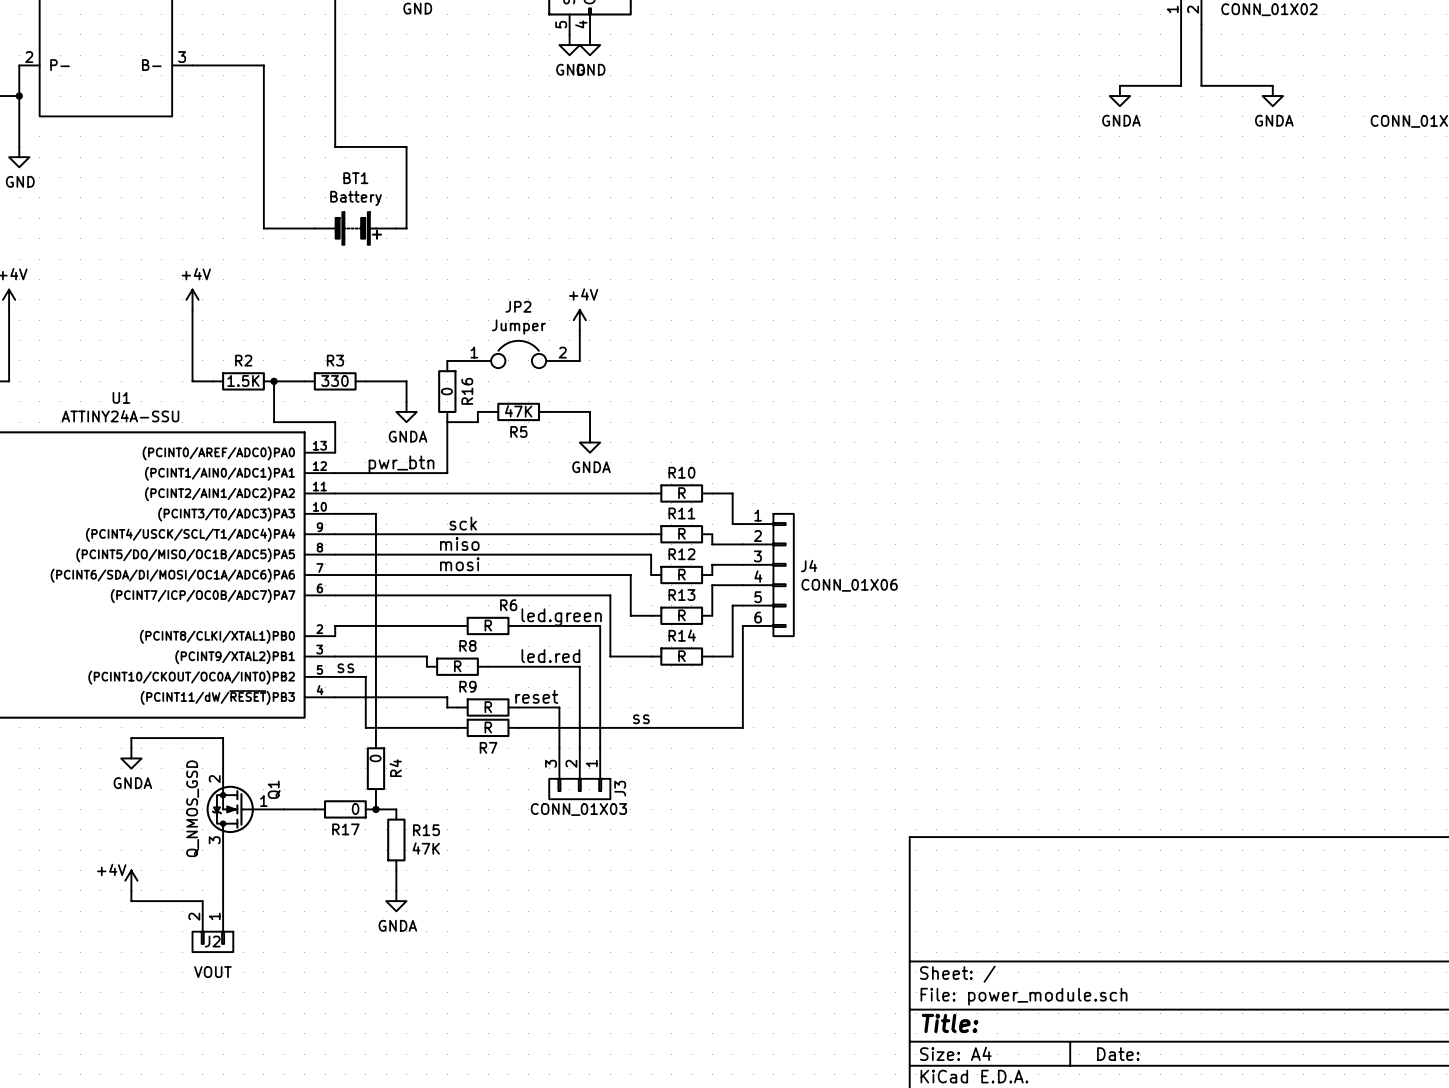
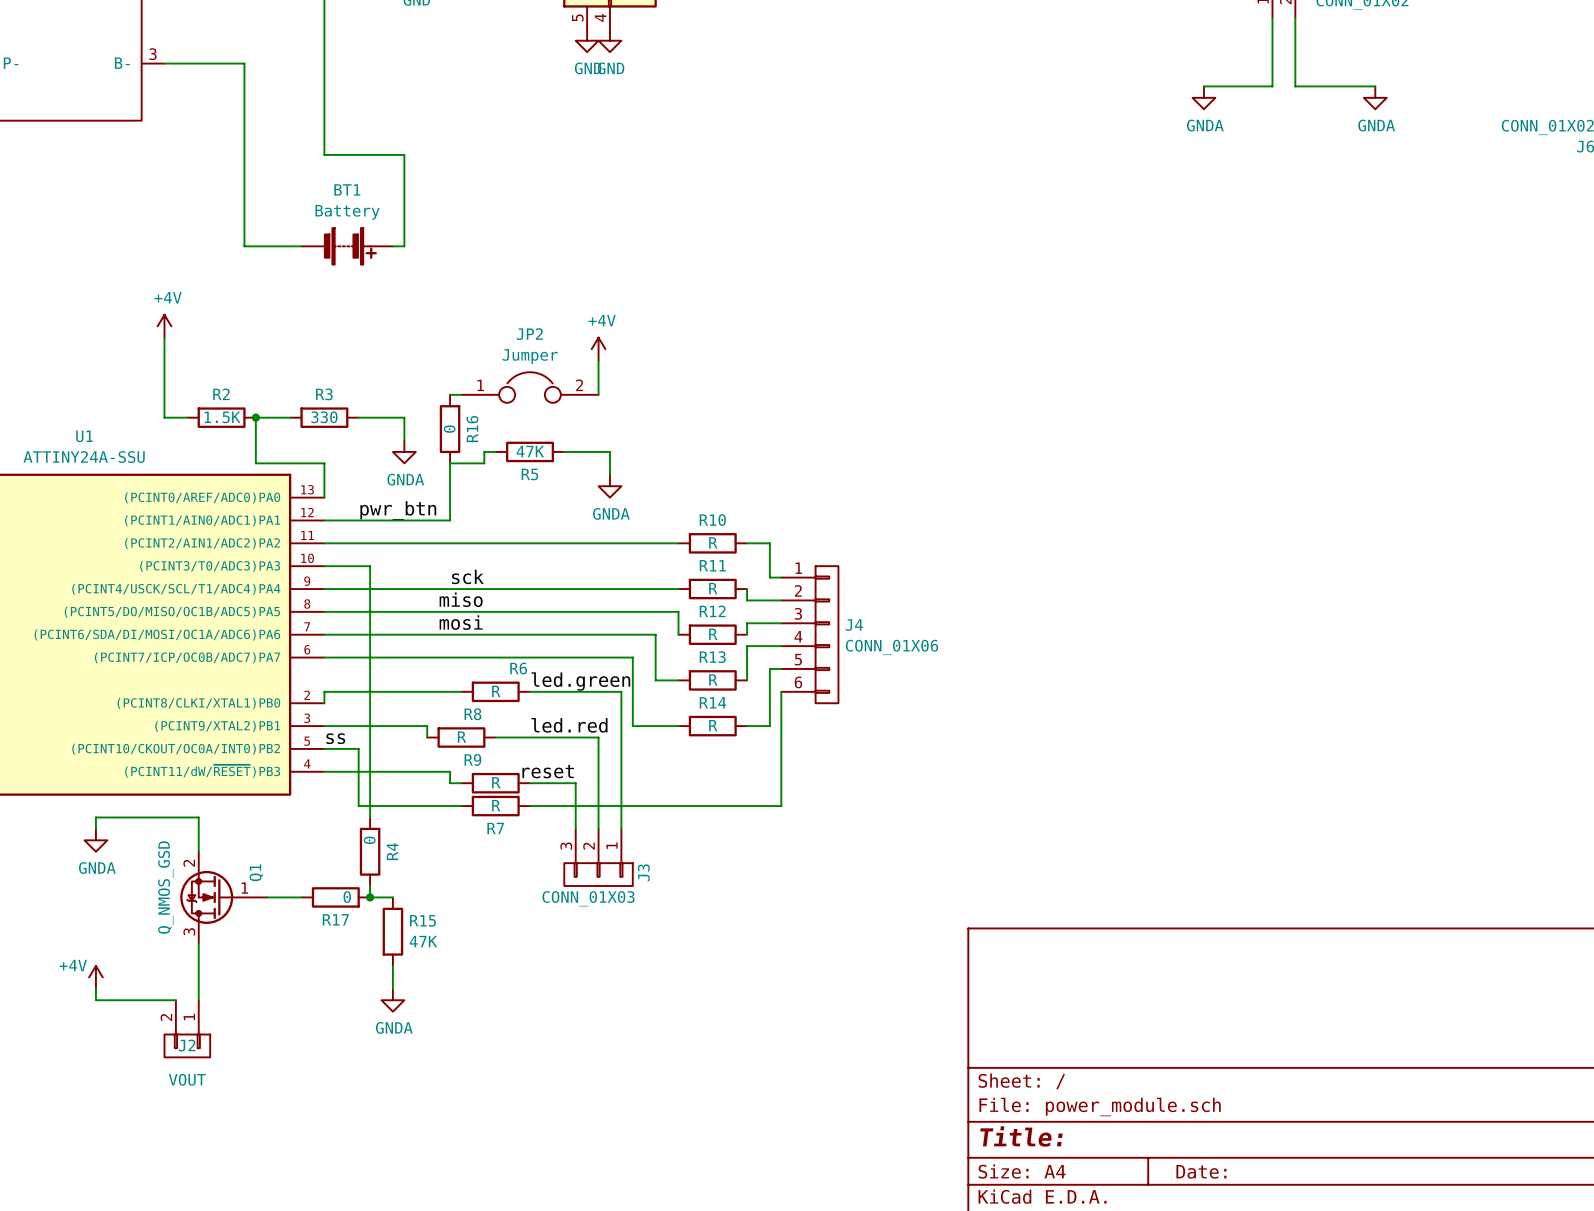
label: ss (641, 719) -> none

